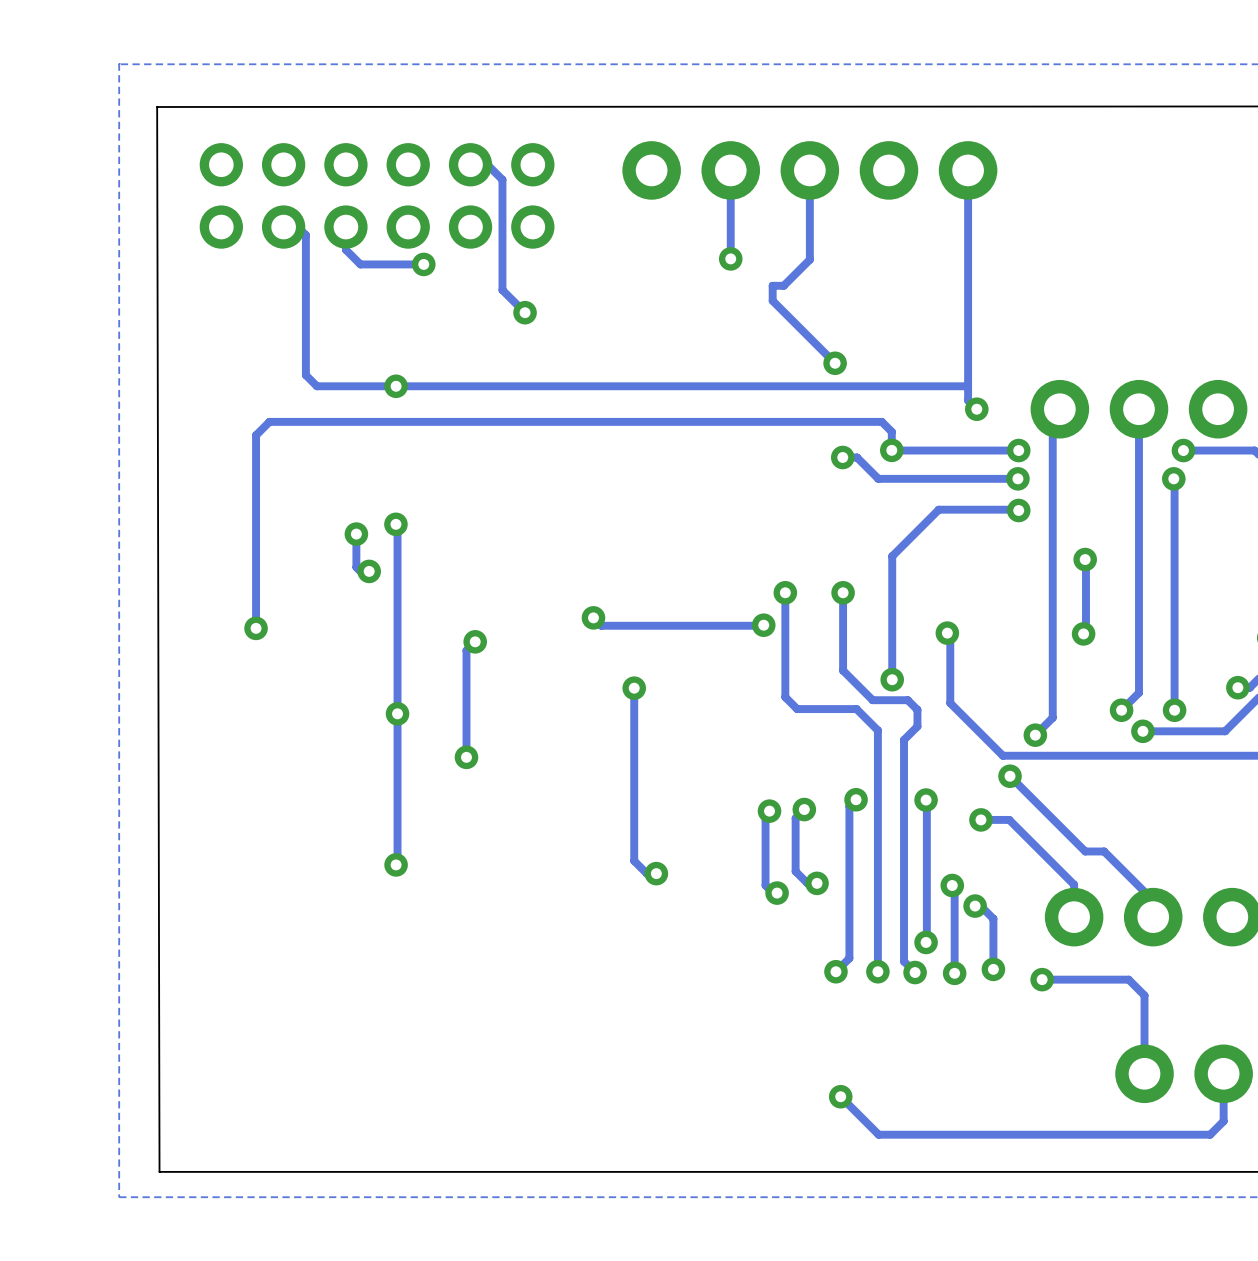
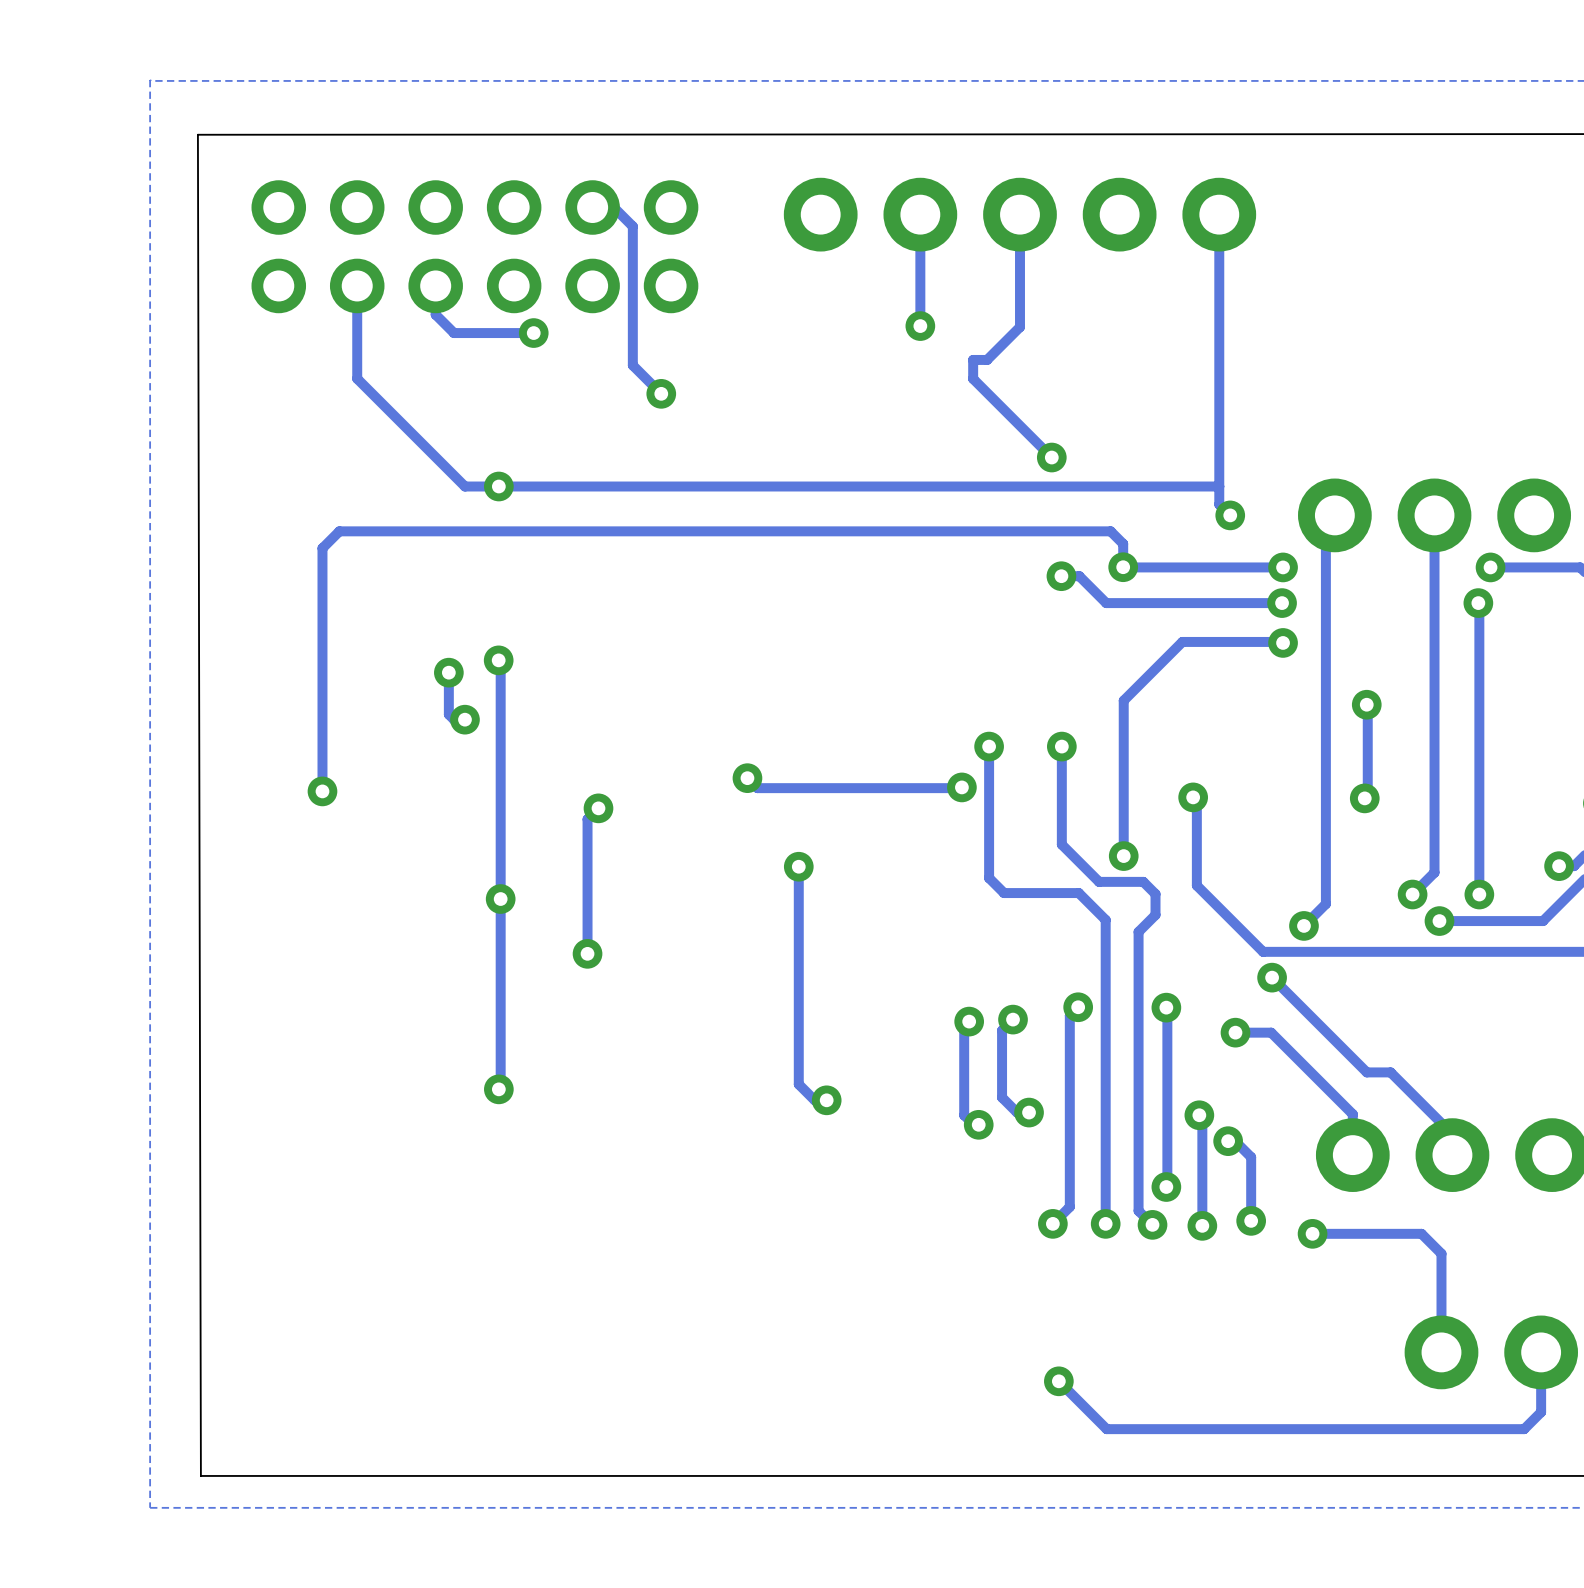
track: (283, 227) (297, 227) (305, 235) (305, 375) (316, 386) (369, 386) -> (357, 285) (357, 378) (464, 486)

